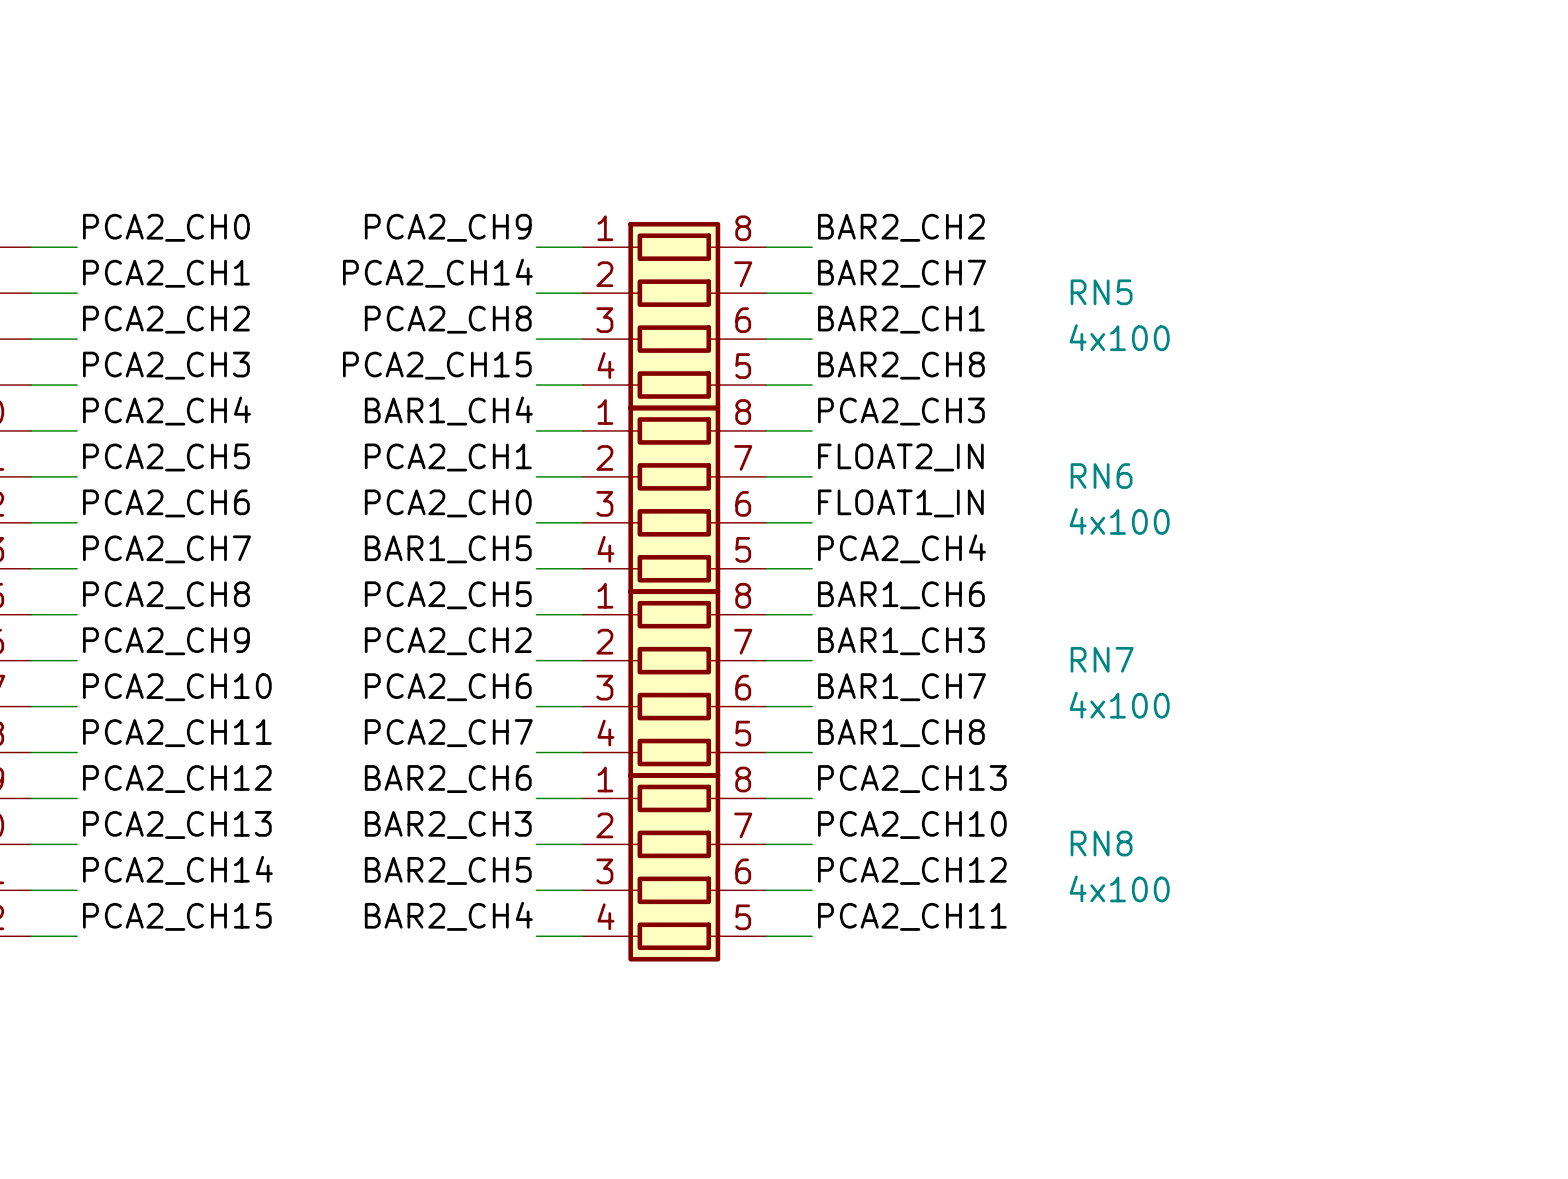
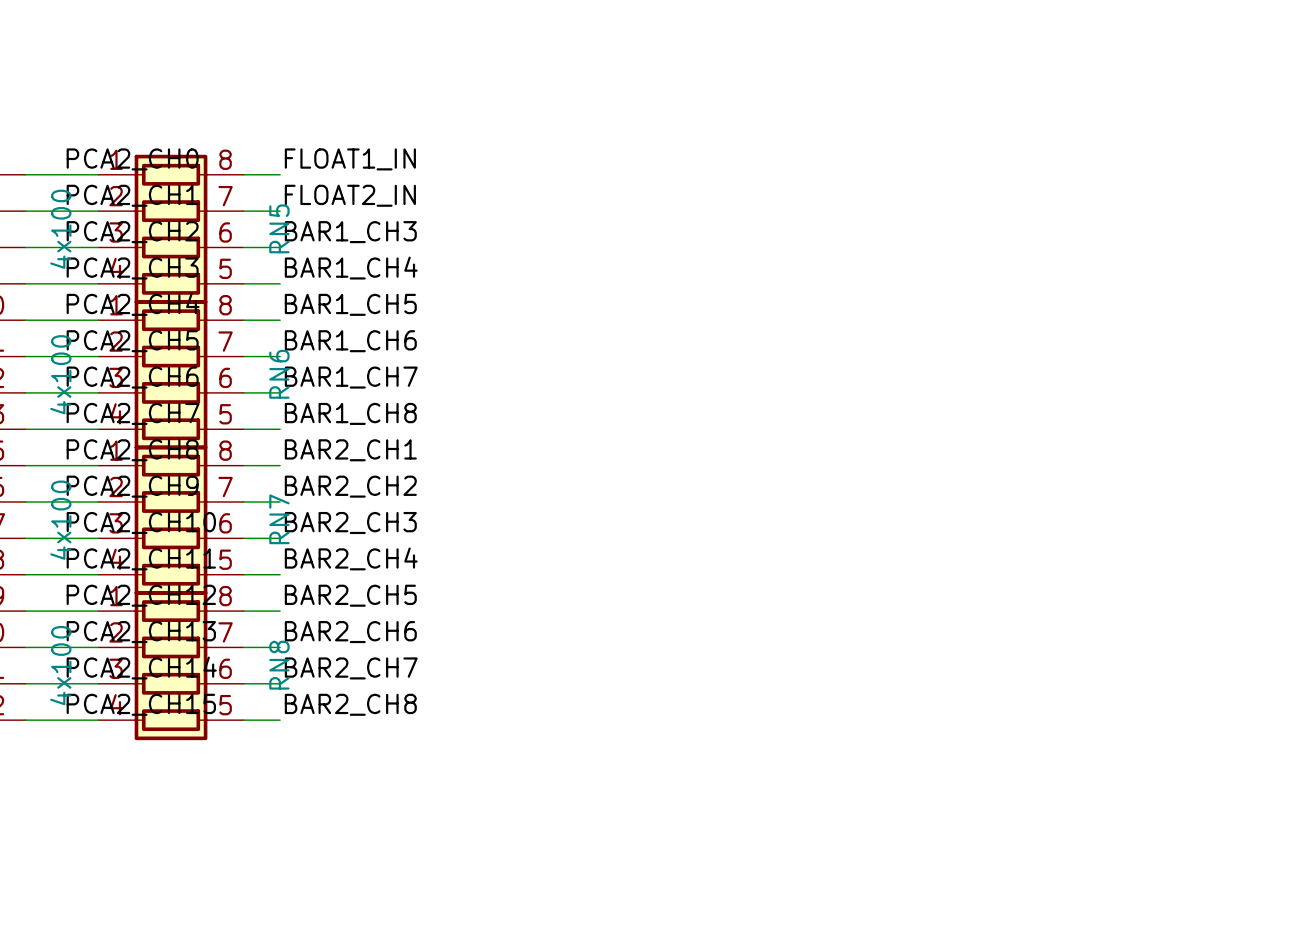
label: none -> FLOAT1_IN (350, 159)
label: PCA2_CH9 (448, 227) -> none
label: BAR2_CH2 (901, 227) -> none
wire: none -> (61, 174) (98, 174)
wire: (536, 247) (582, 247) -> (243, 174) (280, 174)
wire: (766, 247) (812, 247) -> none
label: PCA2_CH14 (437, 273) -> none
label: none -> FLOAT2_IN (350, 195)
label: BAR2_CH7 (901, 273) -> none
RN5 name rotation: 0° (1101, 292) -> 90° counterclockwise (279, 228)
RN5 name position: RN5 (1101, 292) -> RN5 (279, 228)
wire: none -> (61, 211) (98, 211)
wire: (536, 293) (582, 293) -> (243, 211) (280, 211)
wire: (766, 293) (812, 293) -> none
RN5 position: (674, 316) -> (171, 229)
label: none -> BAR1_CH3 (350, 232)
label: PCA2_CH8 (448, 319) -> none
label: BAR2_CH1 (901, 319) -> none
RN5 value rotation: 0° (1119, 337) -> 90° counterclockwise (60, 229)
RN5 value position: 4x100 (1119, 337) -> 4x100 (60, 229)
wire: none -> (61, 247) (98, 247)
wire: (536, 339) (582, 339) -> (243, 247) (280, 247)
wire: (766, 339) (812, 339) -> none
label: PCA2_CH15 (437, 365) -> none
label: BAR2_CH8 (901, 365) -> none
wire: none -> (61, 283) (98, 283)
wire: (536, 385) (582, 385) -> (243, 283) (280, 283)
wire: (766, 385) (812, 385) -> none
label position: BAR1_CH4 (448, 411) -> BAR1_CH4 (351, 268)
label: PCA2_CH3 (901, 411) -> none
wire: none -> (61, 320) (98, 320)
wire: (536, 430) (582, 430) -> (243, 320) (280, 320)
wire: (766, 430) (812, 430) -> none
label: none -> BAR1_CH6 (350, 341)
label: PCA2_CH1 (448, 457) -> none
label: FLOAT2_IN (900, 457) -> none
wire: none -> (61, 356) (98, 356)
wire: (536, 476) (582, 476) -> (243, 356) (280, 356)
wire: (766, 476) (812, 476) -> none
RN6 name rotation: 0° (1101, 476) -> 90° counterclockwise (279, 374)
RN6 name position: RN6 (1101, 476) -> RN6 (279, 374)
RN6 position: (674, 499) -> (171, 374)
label: none -> BAR1_CH7 (351, 377)
label: PCA2_CH0 (448, 503) -> none
label: FLOAT1_IN (900, 503) -> none
RN6 value rotation: 0° (1119, 521) -> 90° counterclockwise (60, 374)
RN6 value position: 4x100 (1119, 521) -> 4x100 (60, 374)
wire: none -> (61, 392) (98, 392)
wire: (536, 522) (582, 522) -> (243, 392) (280, 392)
wire: (766, 522) (812, 522) -> none
label: PCA2_CH4 (901, 548) -> none
label: none -> BAR1_CH8 (350, 413)
label position: BAR1_CH5 (448, 549) -> BAR1_CH5 (350, 304)
wire: none -> (61, 429) (98, 429)
wire: (536, 568) (582, 568) -> (243, 429) (280, 429)
wire: (766, 568) (812, 568) -> none
label: none -> BAR2_CH1 (350, 450)
label: PCA2_CH5 (448, 595) -> none
label: BAR1_CH6 (901, 595) -> none
wire: none -> (61, 465) (98, 465)
wire: (536, 614) (582, 614) -> (243, 465) (280, 465)
wire: (766, 614) (812, 614) -> none
label: none -> BAR2_CH2 (350, 486)
label: PCA2_CH2 (448, 641) -> none
label: BAR1_CH3 (901, 641) -> none
RN7 name rotation: 0° (1102, 659) -> 90° counterclockwise (279, 519)
RN7 name position: RN7 (1102, 659) -> RN7 (279, 519)
wire: none -> (61, 502) (98, 502)
wire: (536, 660) (582, 660) -> (243, 502) (280, 502)
wire: (766, 660) (812, 660) -> none
RN7 position: (674, 683) -> (171, 520)
label: PCA2_CH6 (448, 687) -> none
label: BAR1_CH7 (901, 687) -> none
RN7 value rotation: 0° (1119, 705) -> 90° counterclockwise (60, 520)
RN7 value position: 4x100 (1119, 705) -> 4x100 (60, 520)
wire: none -> (61, 538) (98, 538)
wire: (536, 706) (582, 706) -> (243, 538) (280, 538)
wire: (766, 706) (812, 706) -> none
label: PCA2_CH7 (448, 733) -> none
label: BAR1_CH8 (901, 733) -> none
wire: none -> (61, 574) (98, 574)
wire: (536, 752) (582, 752) -> (243, 574) (280, 574)
wire: (766, 752) (812, 752) -> none
label position: BAR2_CH6 (448, 779) -> BAR2_CH6 (350, 632)
label: PCA2_CH13 (912, 779) -> none
wire: none -> (61, 611) (98, 611)
wire: (536, 798) (582, 798) -> (243, 611) (280, 611)
wire: (766, 798) (812, 798) -> none
label position: BAR2_CH3 (448, 824) -> BAR2_CH3 (350, 523)
label: PCA2_CH10 (912, 824) -> none
RN8 name rotation: 0° (1101, 843) -> 90° counterclockwise (279, 665)
RN8 name position: RN8 (1101, 843) -> RN8 (279, 665)
wire: none -> (61, 647) (98, 647)
wire: (536, 844) (582, 844) -> (243, 647) (280, 647)
wire: (766, 844) (812, 844) -> none
RN8 position: (674, 867) -> (171, 665)
label: none -> BAR2_CH7 (351, 668)
label position: BAR2_CH5 (448, 870) -> BAR2_CH5 (350, 595)
label: PCA2_CH12 (912, 870) -> none
RN8 value rotation: 0° (1119, 888) -> 90° counterclockwise (60, 665)
RN8 value position: 4x100 (1119, 888) -> 4x100 (60, 665)
wire: none -> (61, 683) (98, 683)
wire: (536, 890) (582, 890) -> (243, 683) (280, 683)
wire: (766, 890) (812, 890) -> none
label: none -> BAR2_CH8 (350, 704)
label position: BAR2_CH4 (448, 916) -> BAR2_CH4 (351, 558)
label: PCA2_CH11 (912, 916) -> none
wire: none -> (61, 720) (98, 720)
wire: (536, 936) (582, 936) -> (243, 720) (280, 720)
wire: (766, 936) (812, 936) -> none

